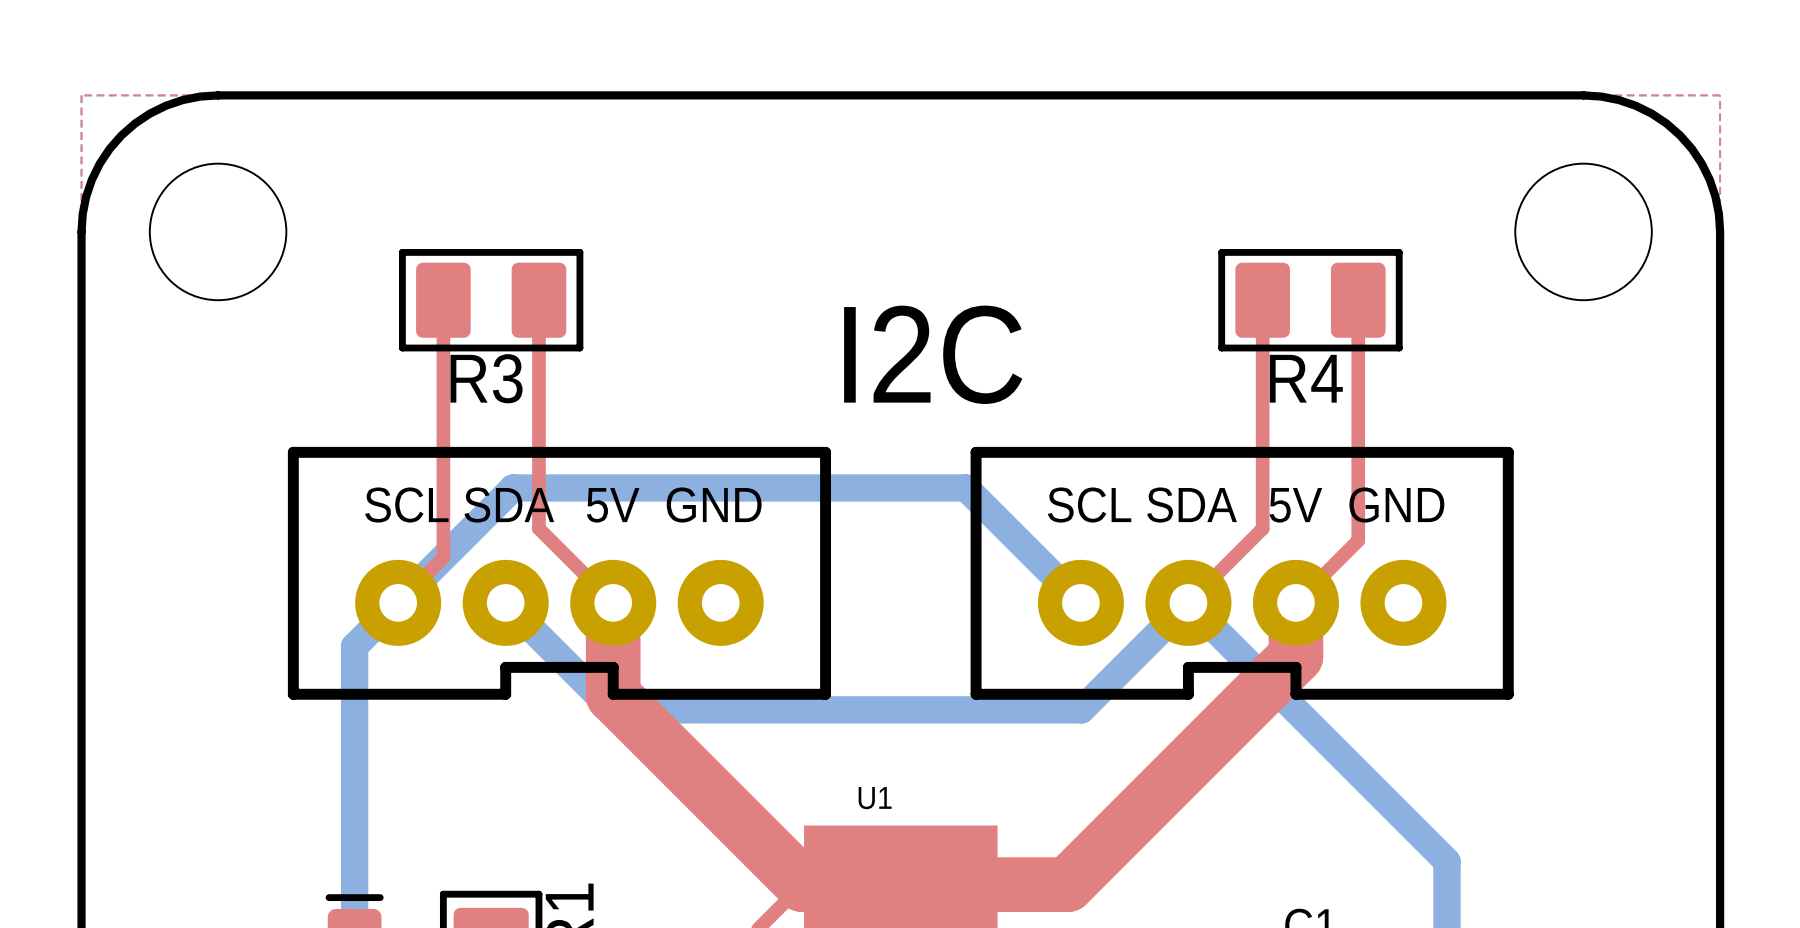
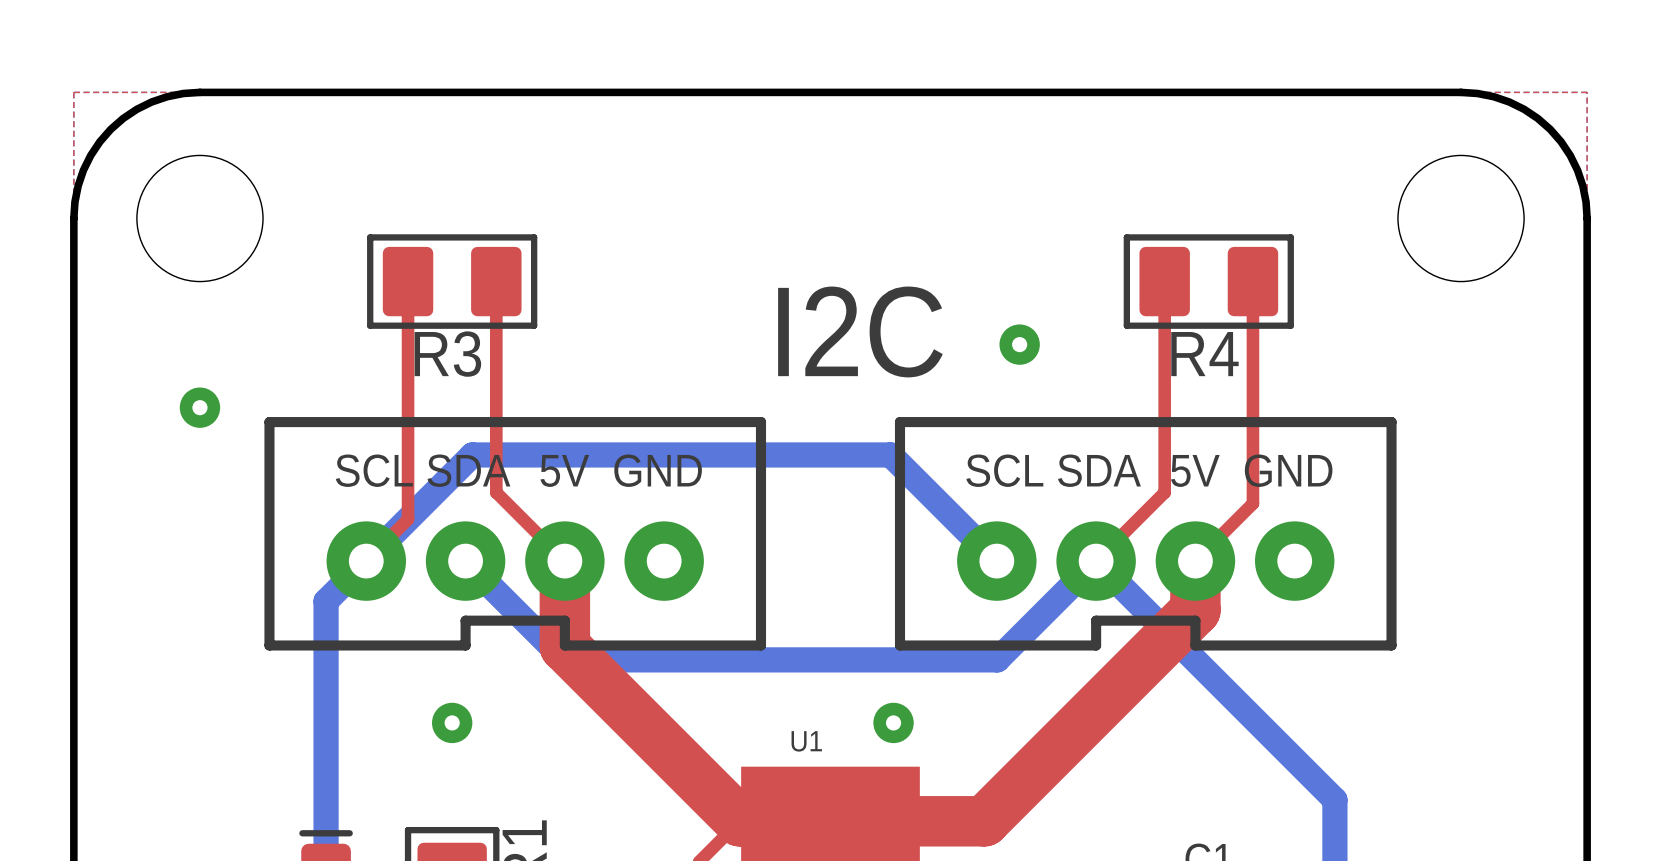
via: none -> (1019, 344)
via: none -> (199, 407)
via: none -> (452, 722)
via: none -> (893, 722)

